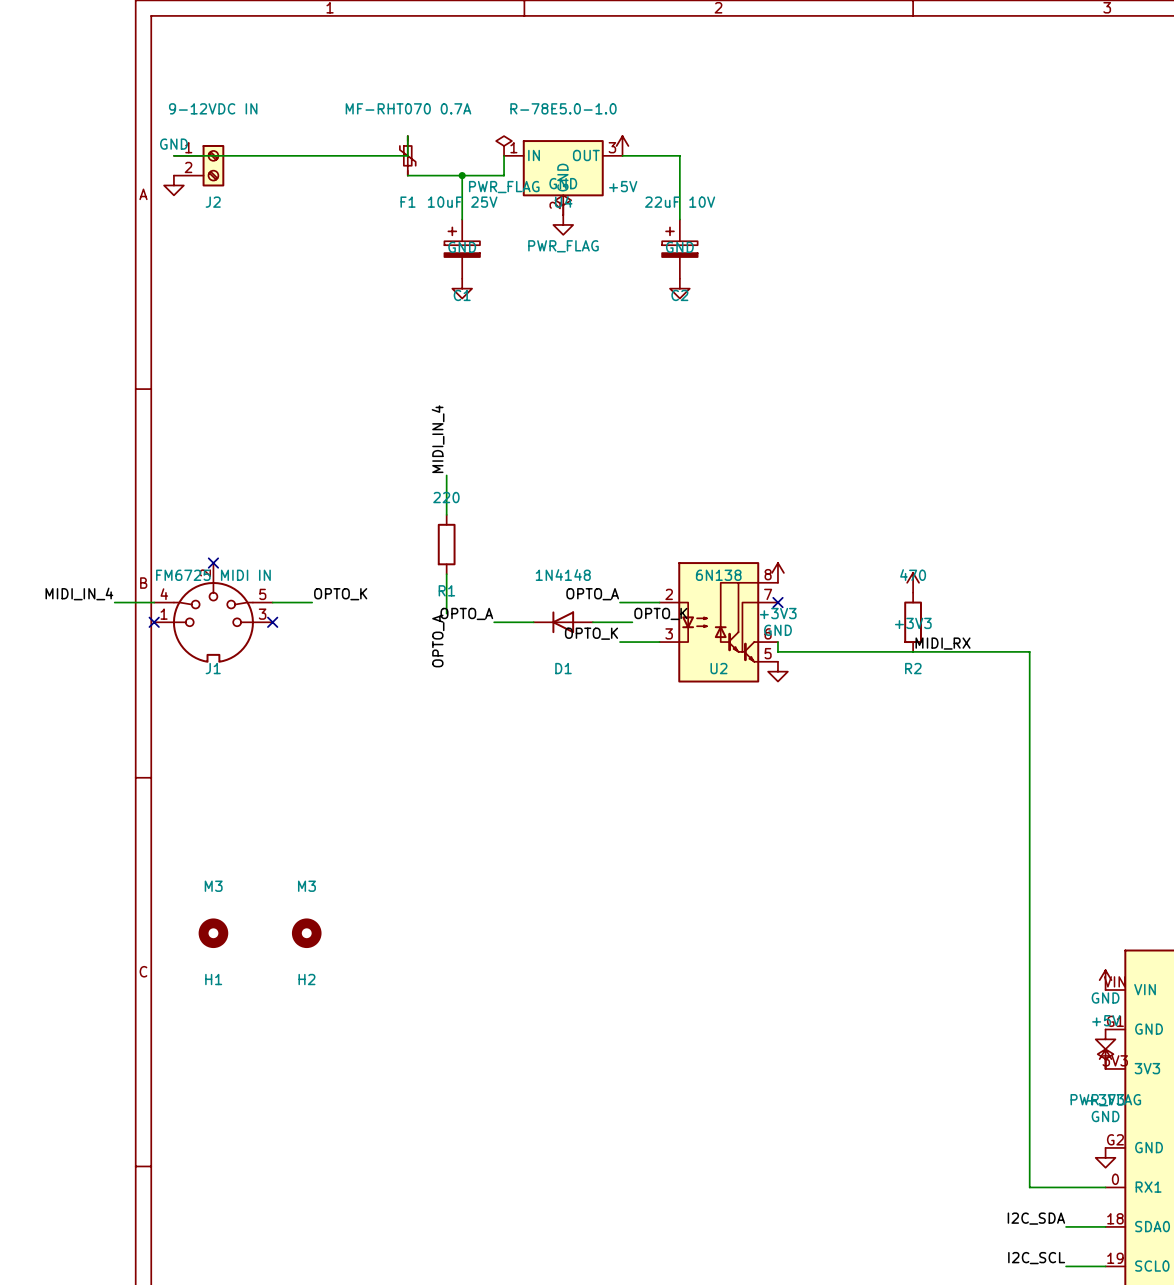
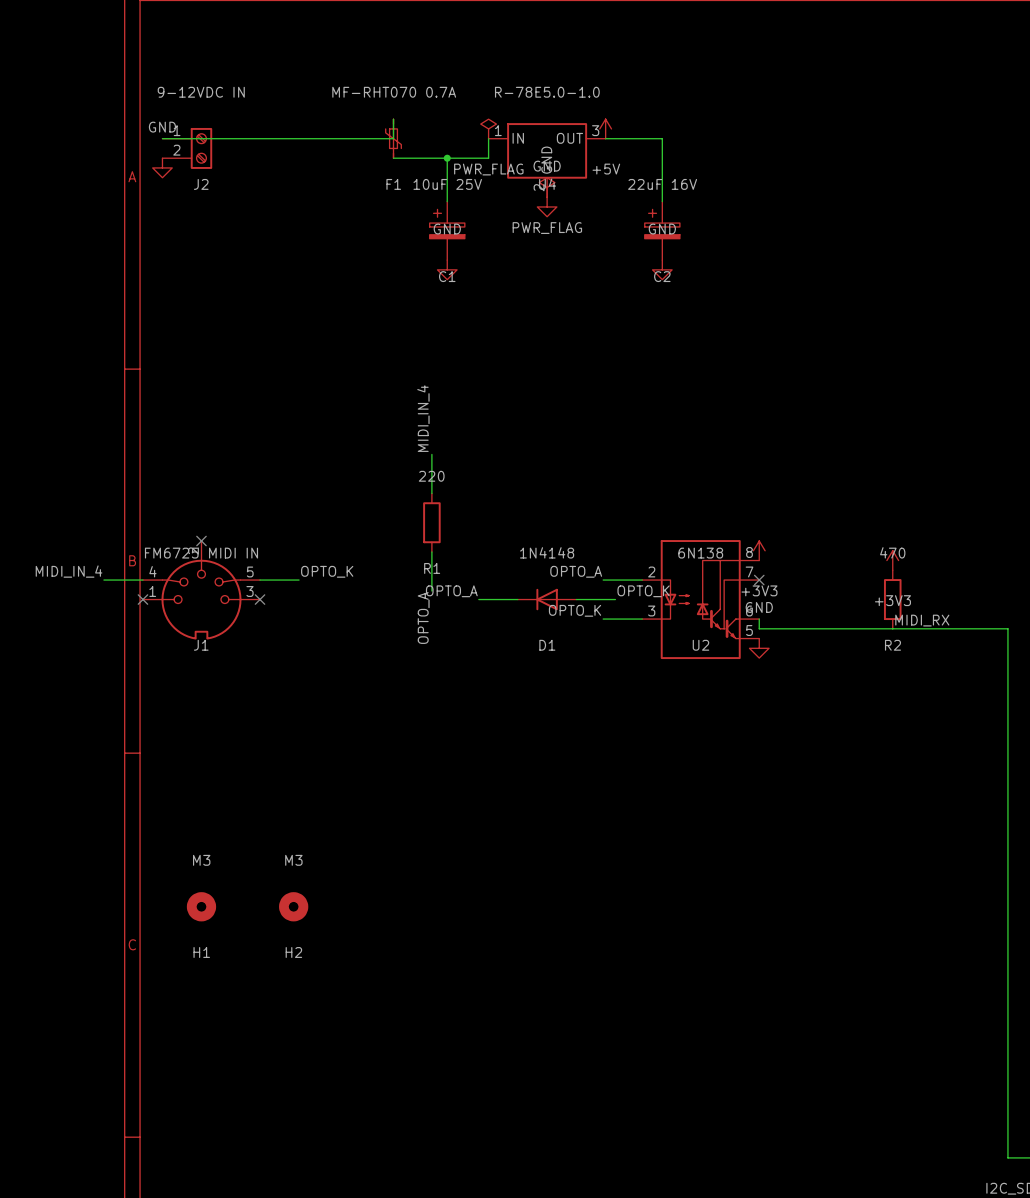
C2 value: 22uF 10V (680, 202) -> 22uF 16V (662, 184)

